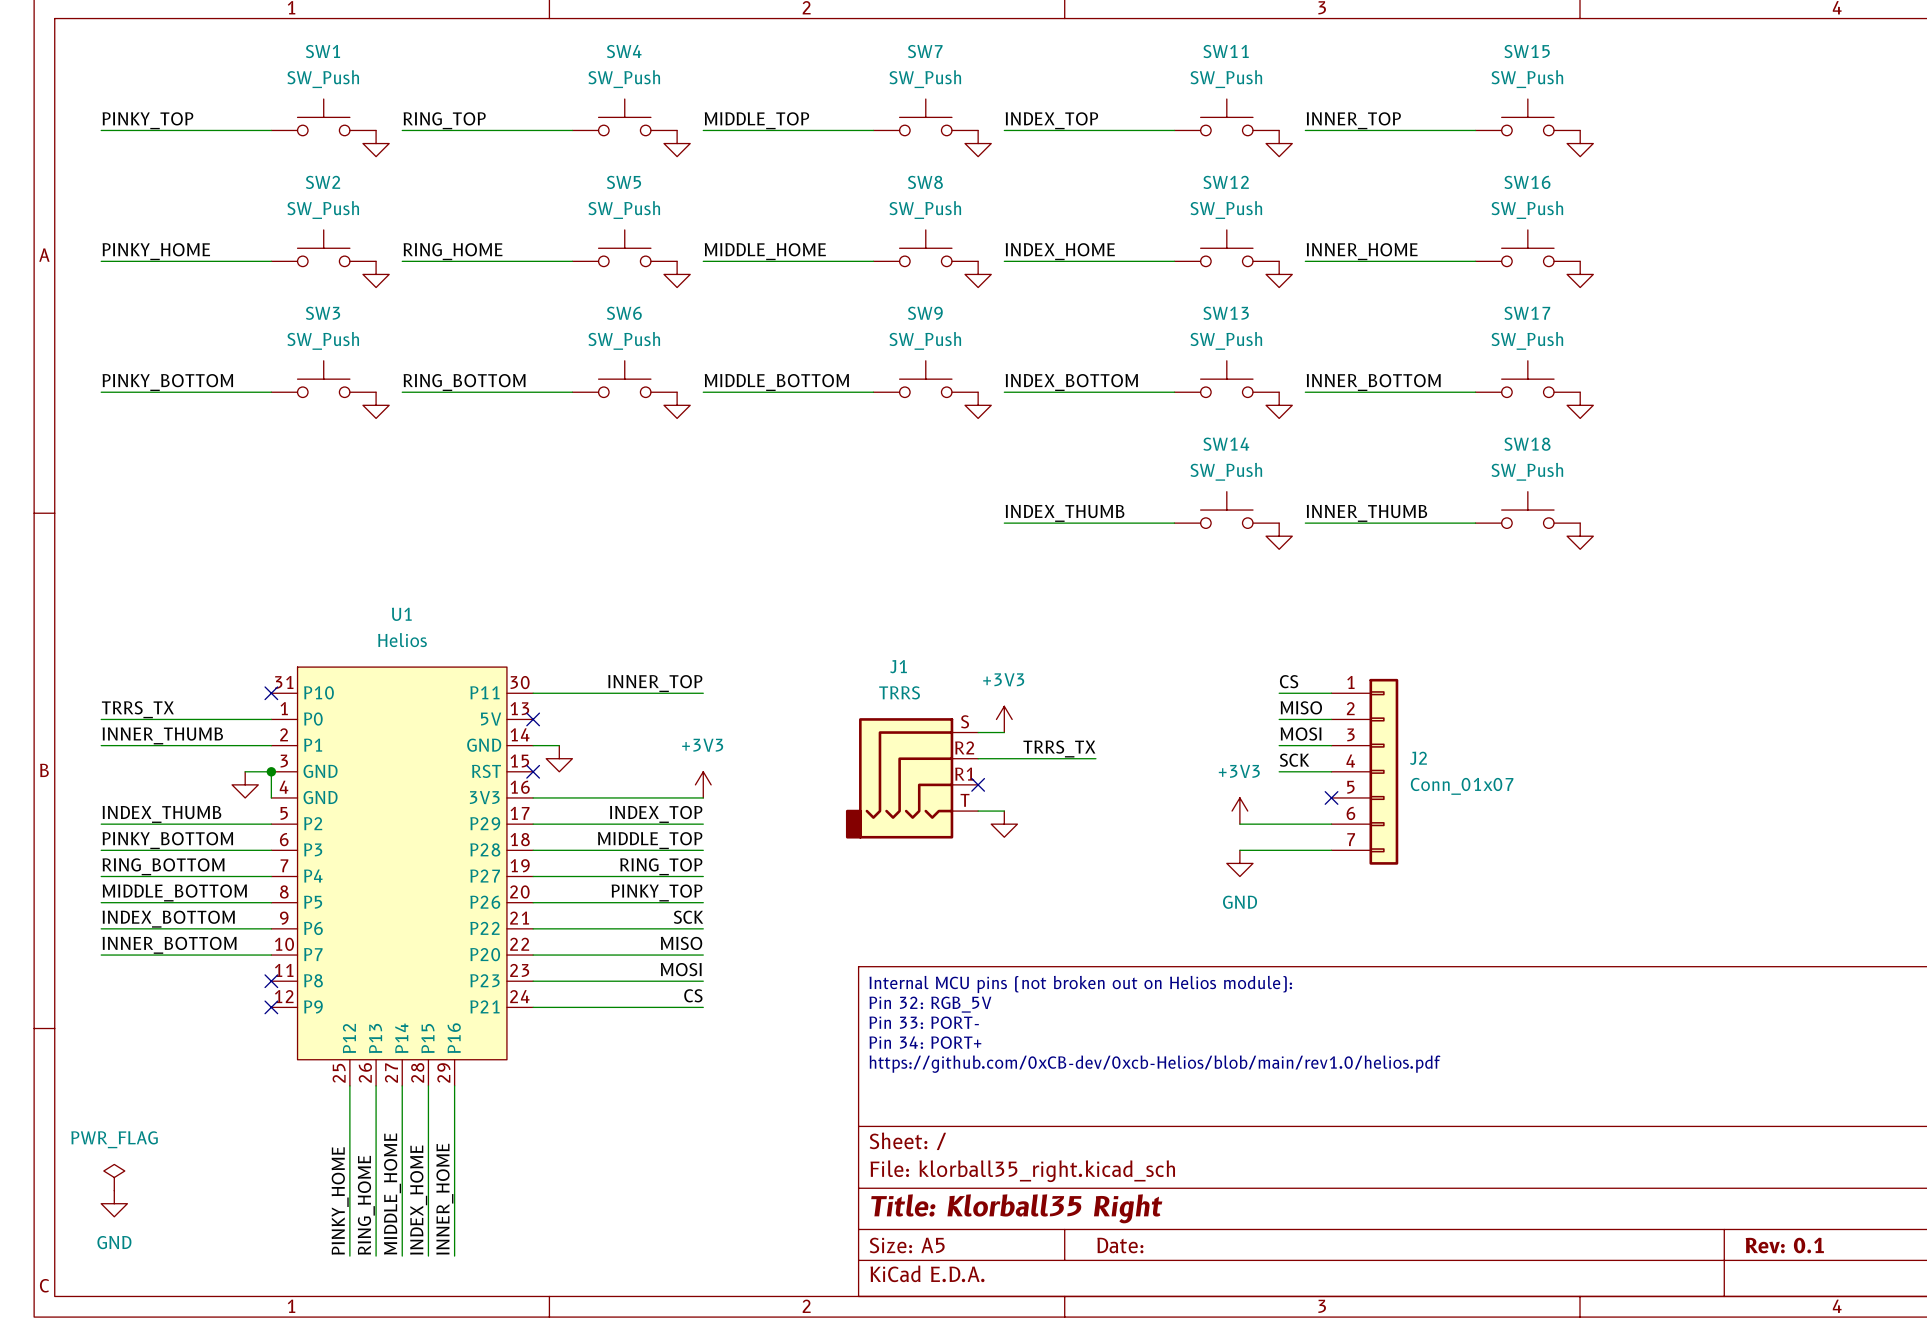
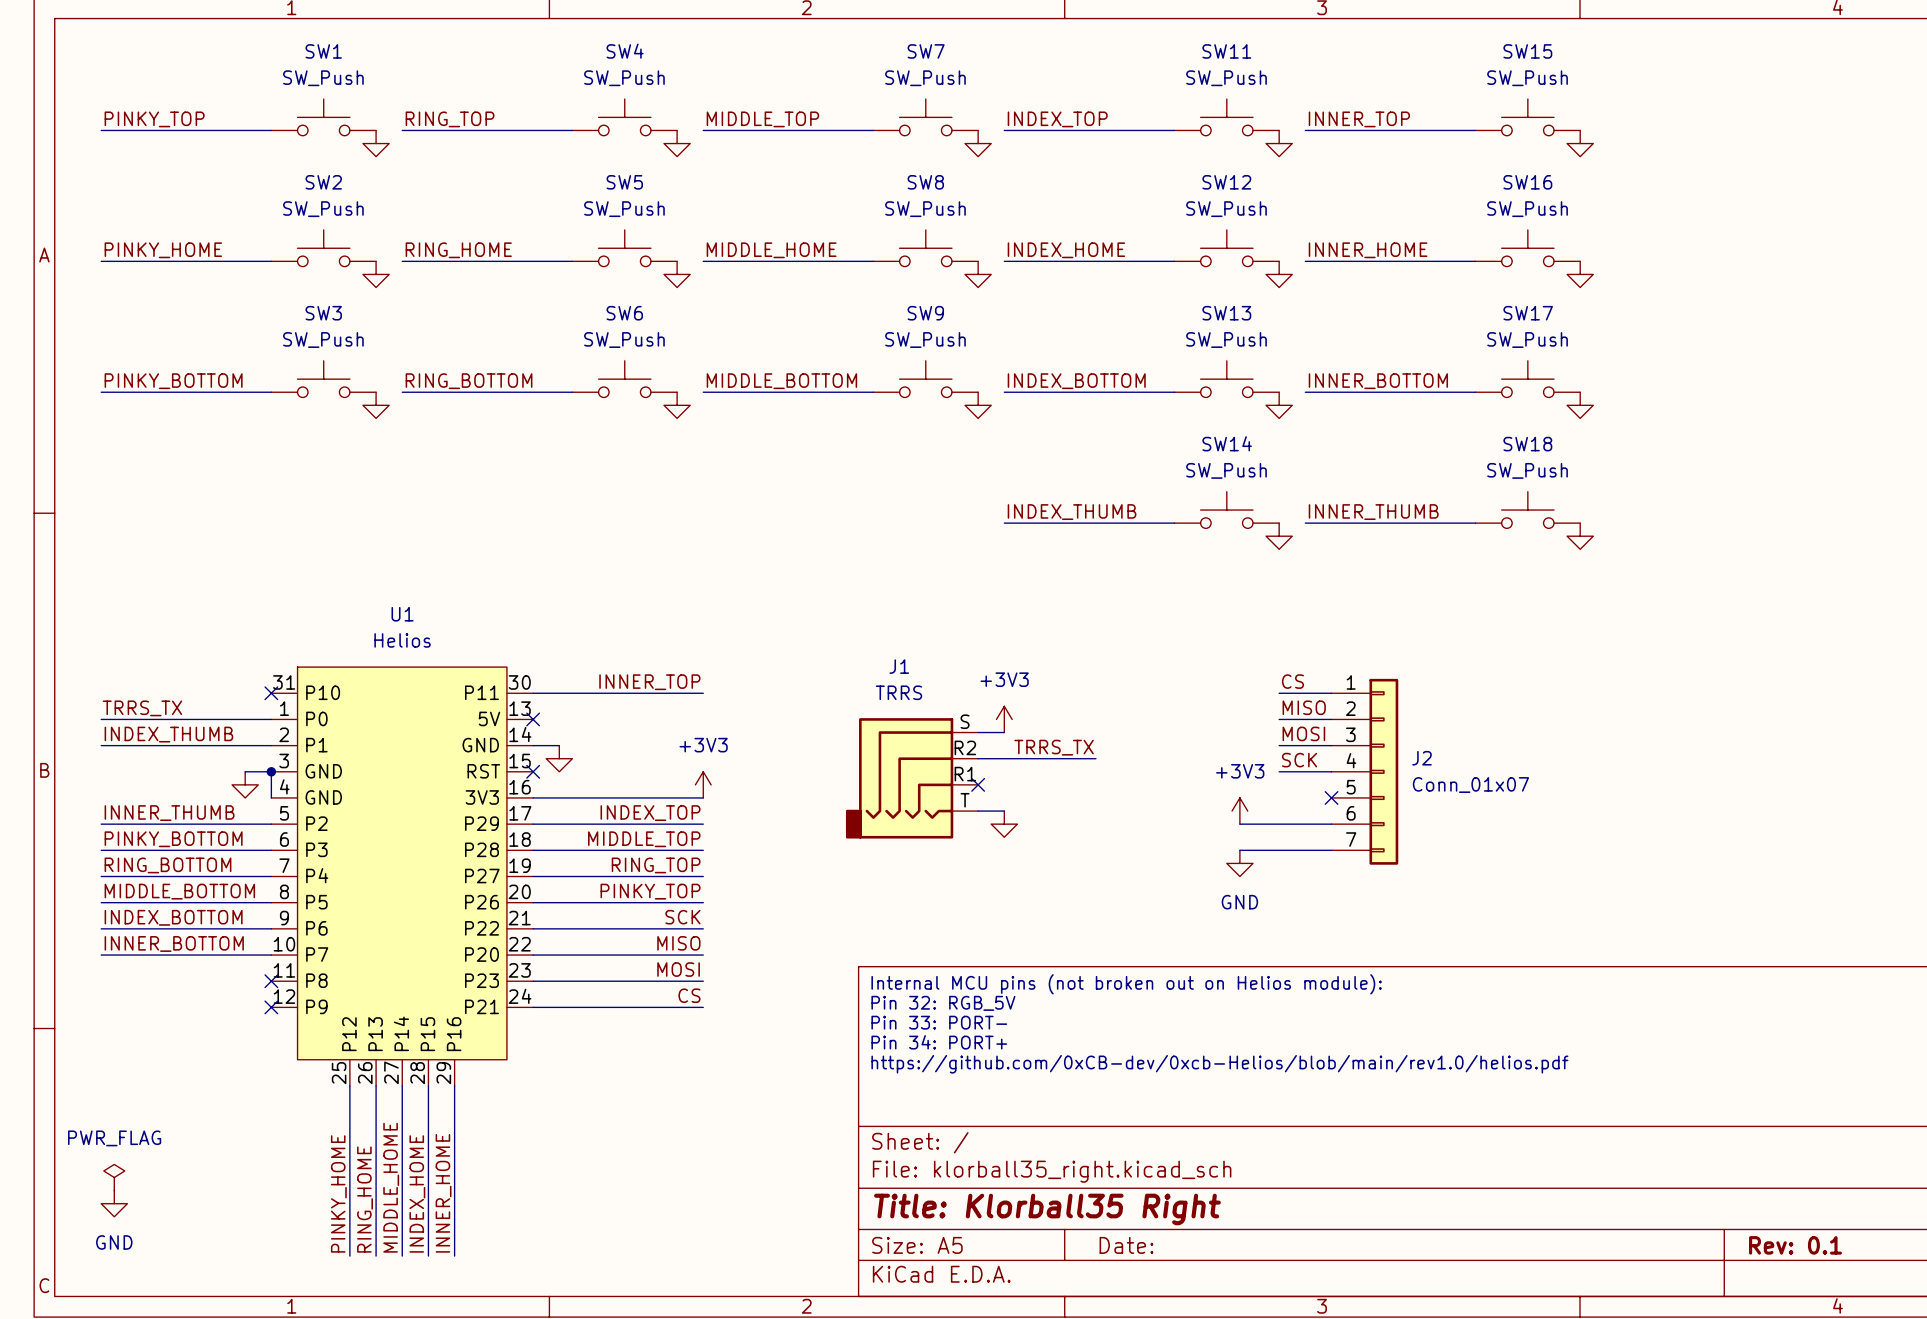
label: INNER_THUMB (162, 735) -> INDEX_THUMB (168, 734)
label: INDEX_THUMB (161, 814) -> INNER_THUMB (169, 813)

